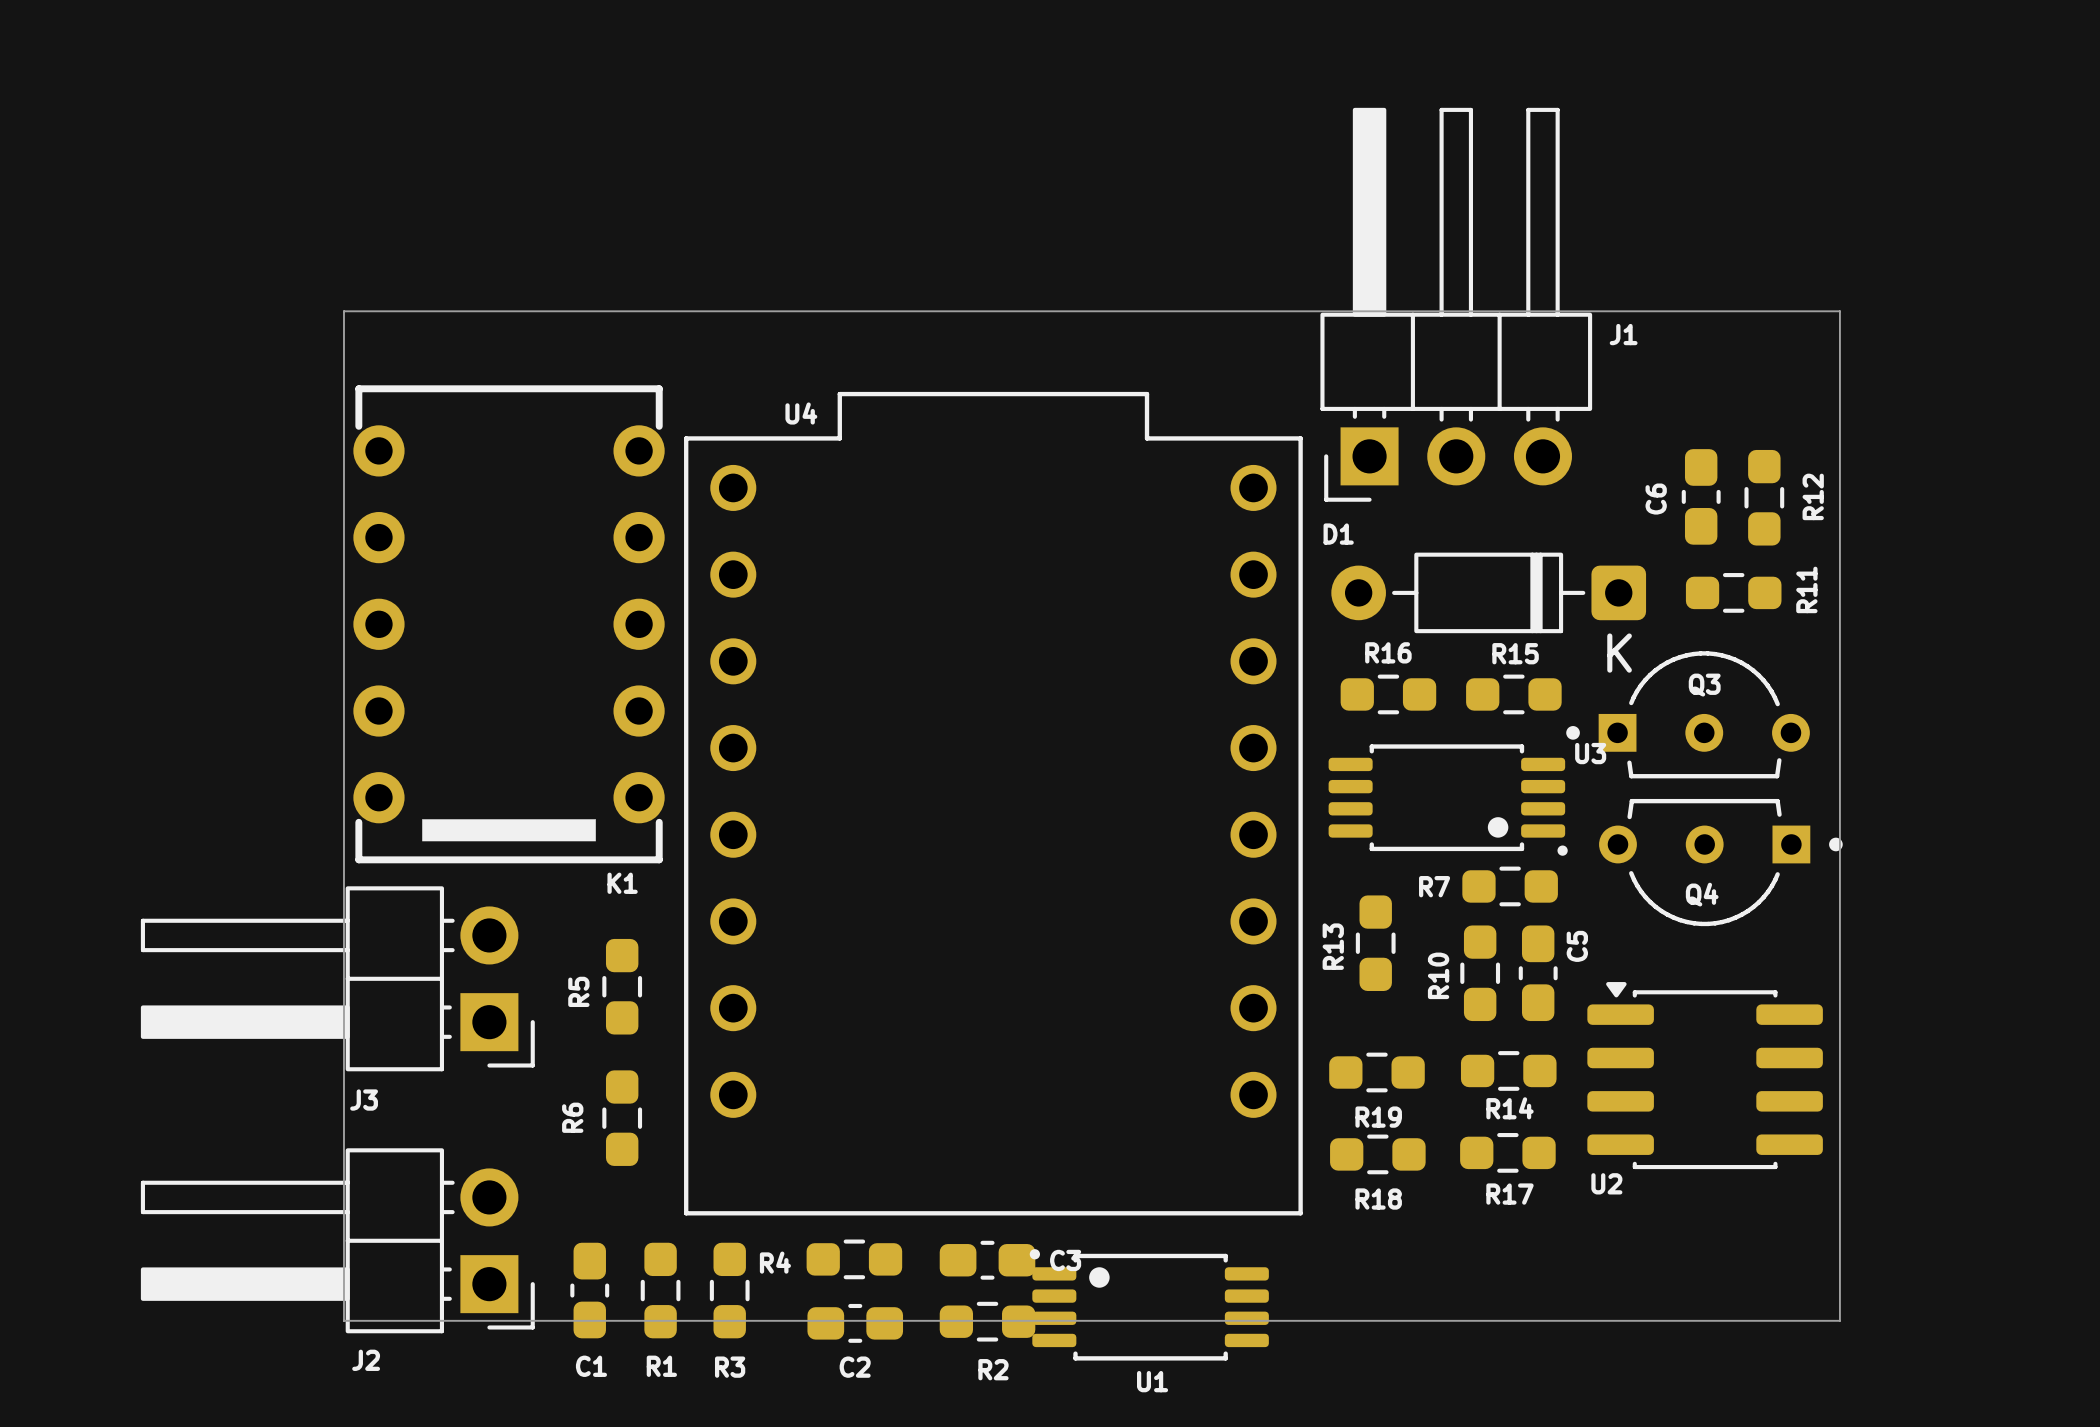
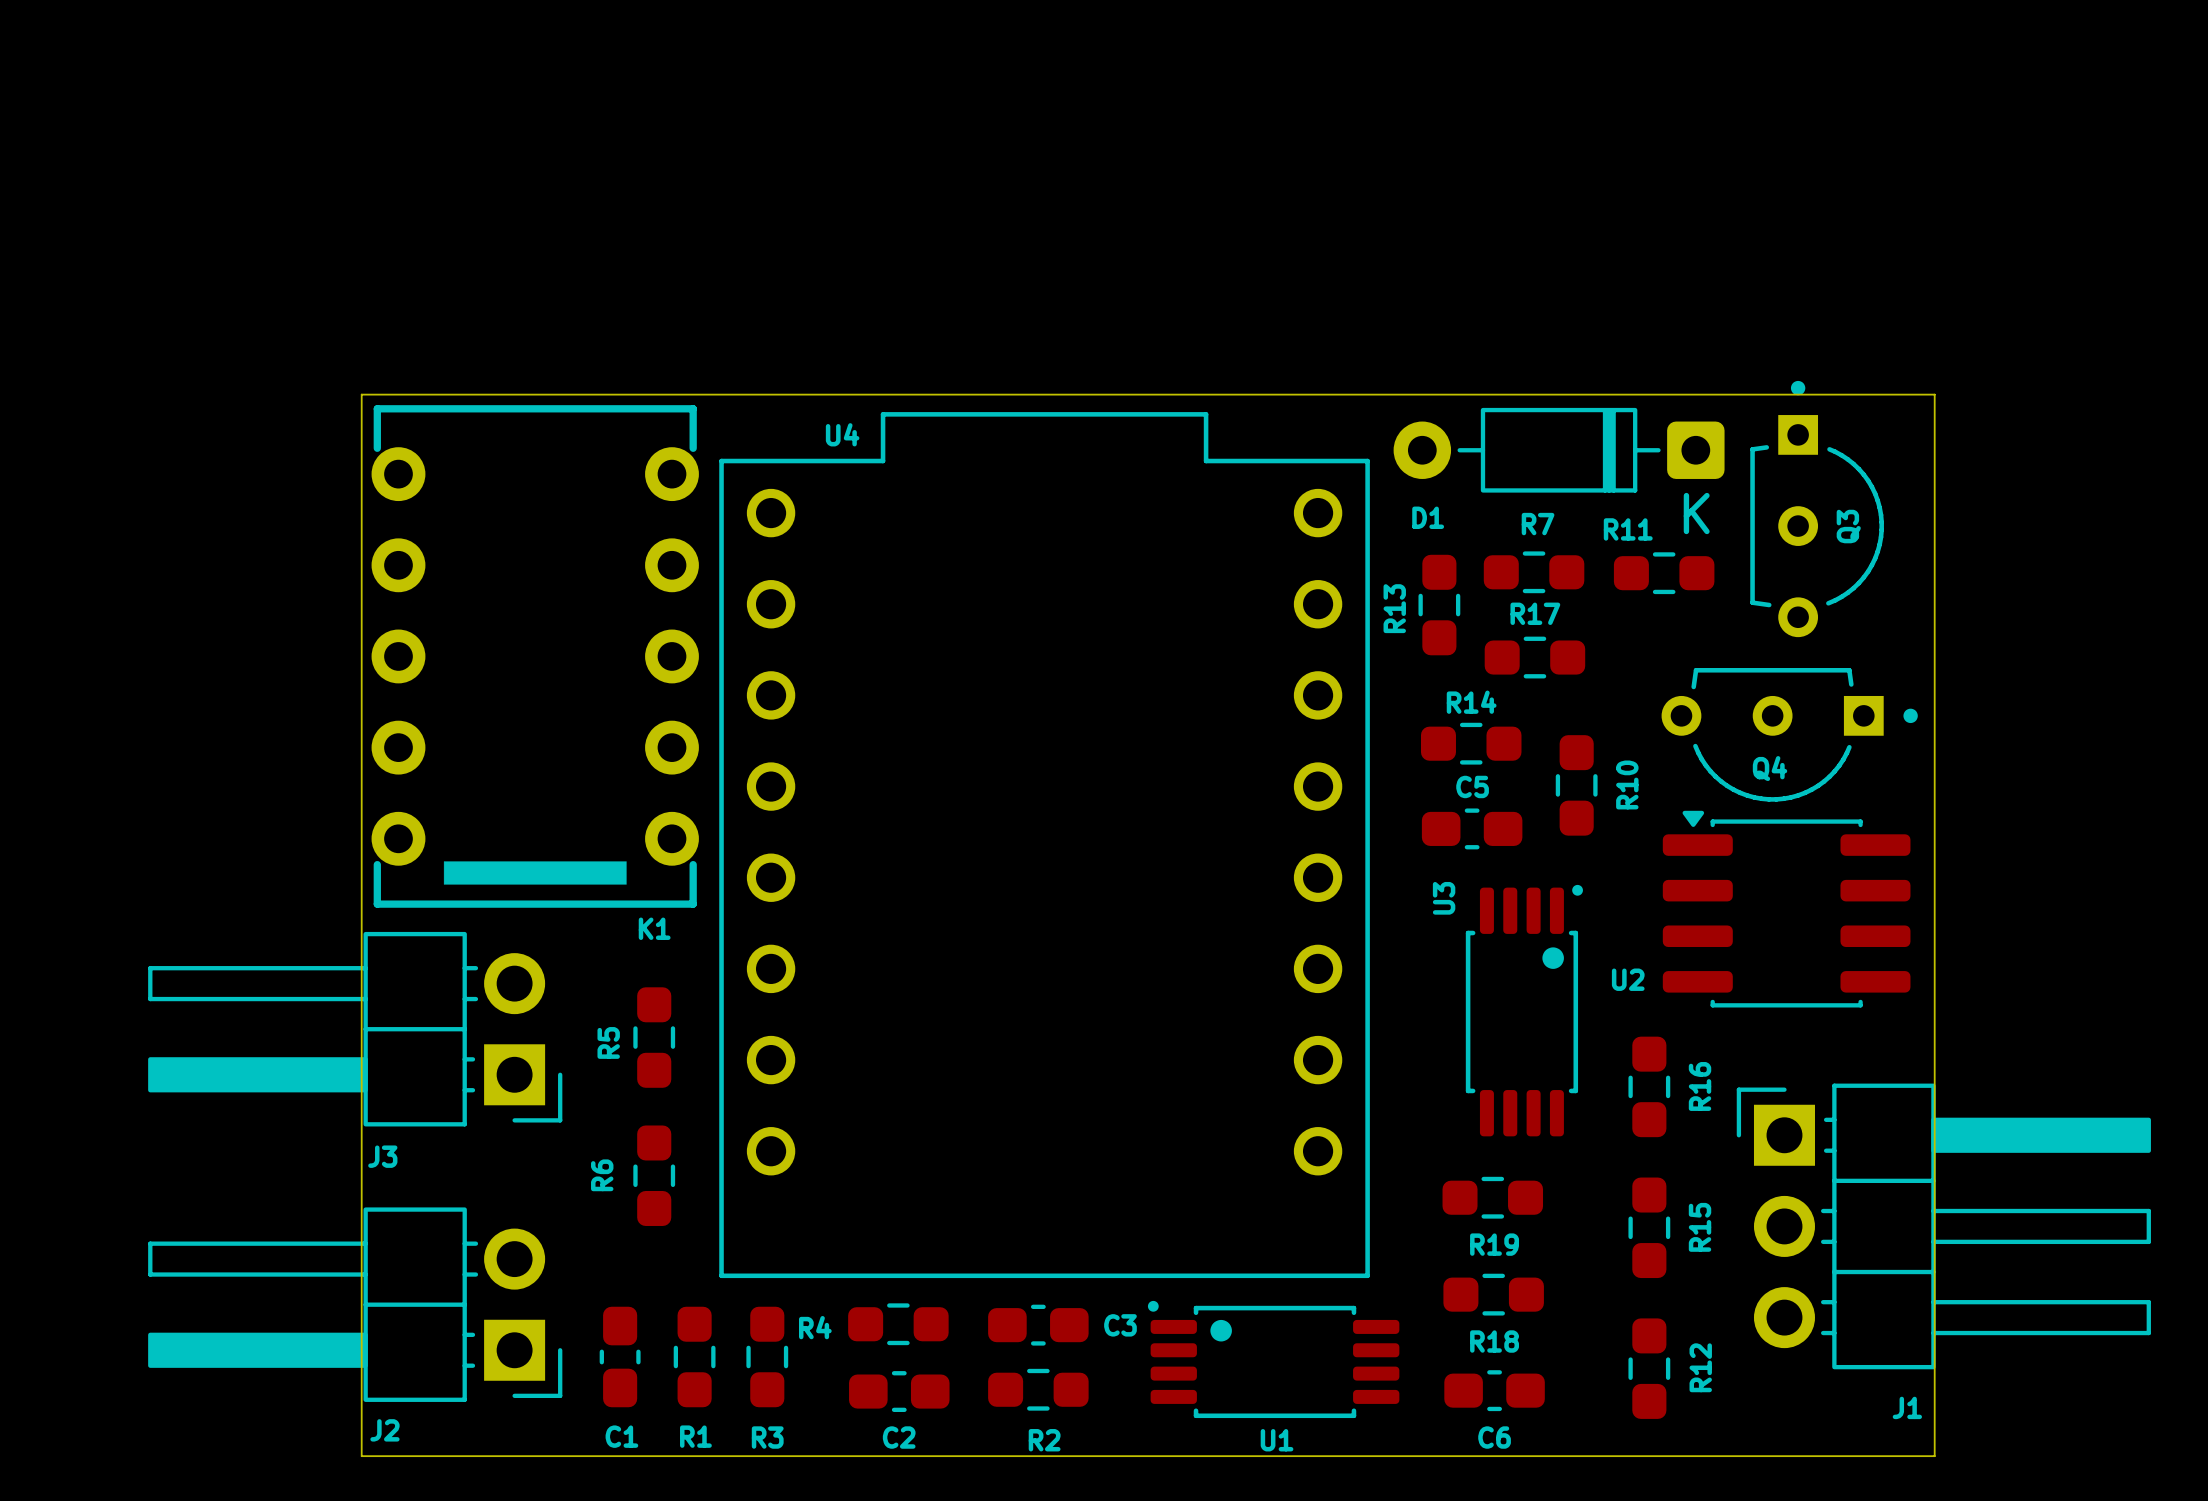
J1 rotation: 0° (1456, 304) -> 90° clockwise (1943, 1226)
J1 position: (1456, 304) -> (1943, 1226)
board edge: (343, 375) (343, 311) (1839, 311) (1839, 375) -> (361, 394) (1934, 394)
C6 rotation: 0° (1701, 496) -> 90° clockwise (1494, 1390)
C6 position: (1701, 496) -> (1494, 1390)
R12 position: (1764, 497) -> (1649, 1368)
D1 name position: D1 (1338, 534) -> D1 (1428, 517)
R11 name rotation: 0° (1806, 589) -> 90° clockwise (1628, 529)
R11 name position: R11 (1806, 589) -> R11 (1628, 529)
D1 position: (1488, 592) -> (1559, 450)
R11 position: (1733, 592) -> (1664, 573)
R16 rotation: 0° (1388, 694) -> 90° clockwise (1649, 1086)
R16 position: (1388, 694) -> (1649, 1086)
R15 rotation: 0° (1513, 694) -> 90° clockwise (1649, 1227)
R15 position: (1513, 694) -> (1649, 1227)
Q3 rotation: 0° (1688, 714) -> 90° clockwise (1817, 509)
Q3 position: (1688, 714) -> (1817, 509)
U3 rotation: 0° (1448, 800) -> 90° counterclockwise (1524, 1010)
U3 position: (1448, 800) -> (1524, 1010)
Q4 position: (1720, 862) -> (1789, 734)
R7 name position: R7 (1434, 886) -> R7 (1538, 524)
R7 position: (1510, 886) -> (1534, 572)
R13 position: (1375, 943) -> (1439, 605)
R10 position: (1480, 973) -> (1576, 785)
C5 rotation: 0° (1538, 973) -> 90° clockwise (1472, 828)
C5 position: (1538, 973) -> (1472, 828)
R10 name position: R10 (1438, 975) -> R10 (1627, 784)
R14 position: (1508, 1070) -> (1471, 743)
R19 position: (1376, 1072) -> (1492, 1197)
U2 position: (1705, 1075) -> (1786, 909)
R14 name position: R14 (1509, 1108) -> R14 (1471, 702)
R17 position: (1507, 1152) -> (1534, 657)
R18 position: (1377, 1154) -> (1493, 1294)
U2 name position: U2 (1606, 1183) -> U2 (1628, 979)
R17 name position: R17 (1509, 1194) -> R17 (1535, 613)
U1 position: (1149, 1304) -> (1273, 1359)
board edge: (343, 1320) (1839, 1320) -> (361, 1388) (361, 1456) (1934, 1456) (1934, 1388)

